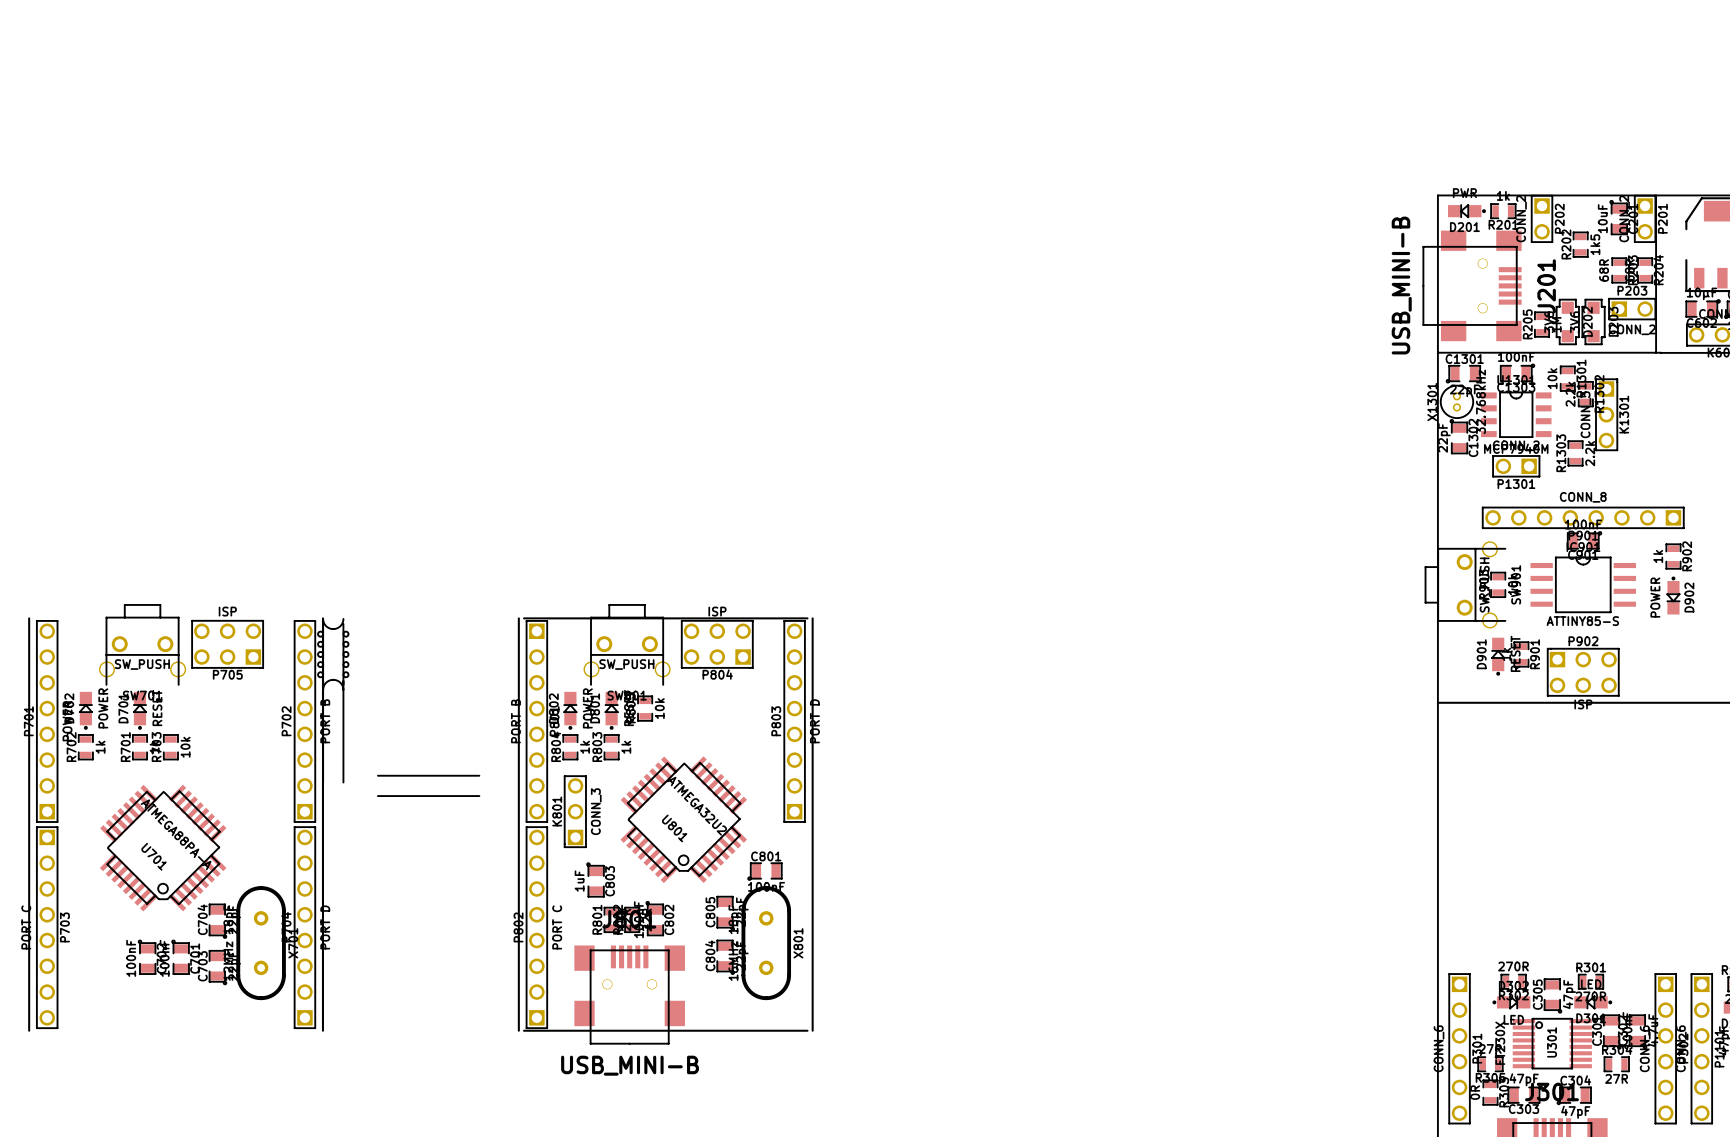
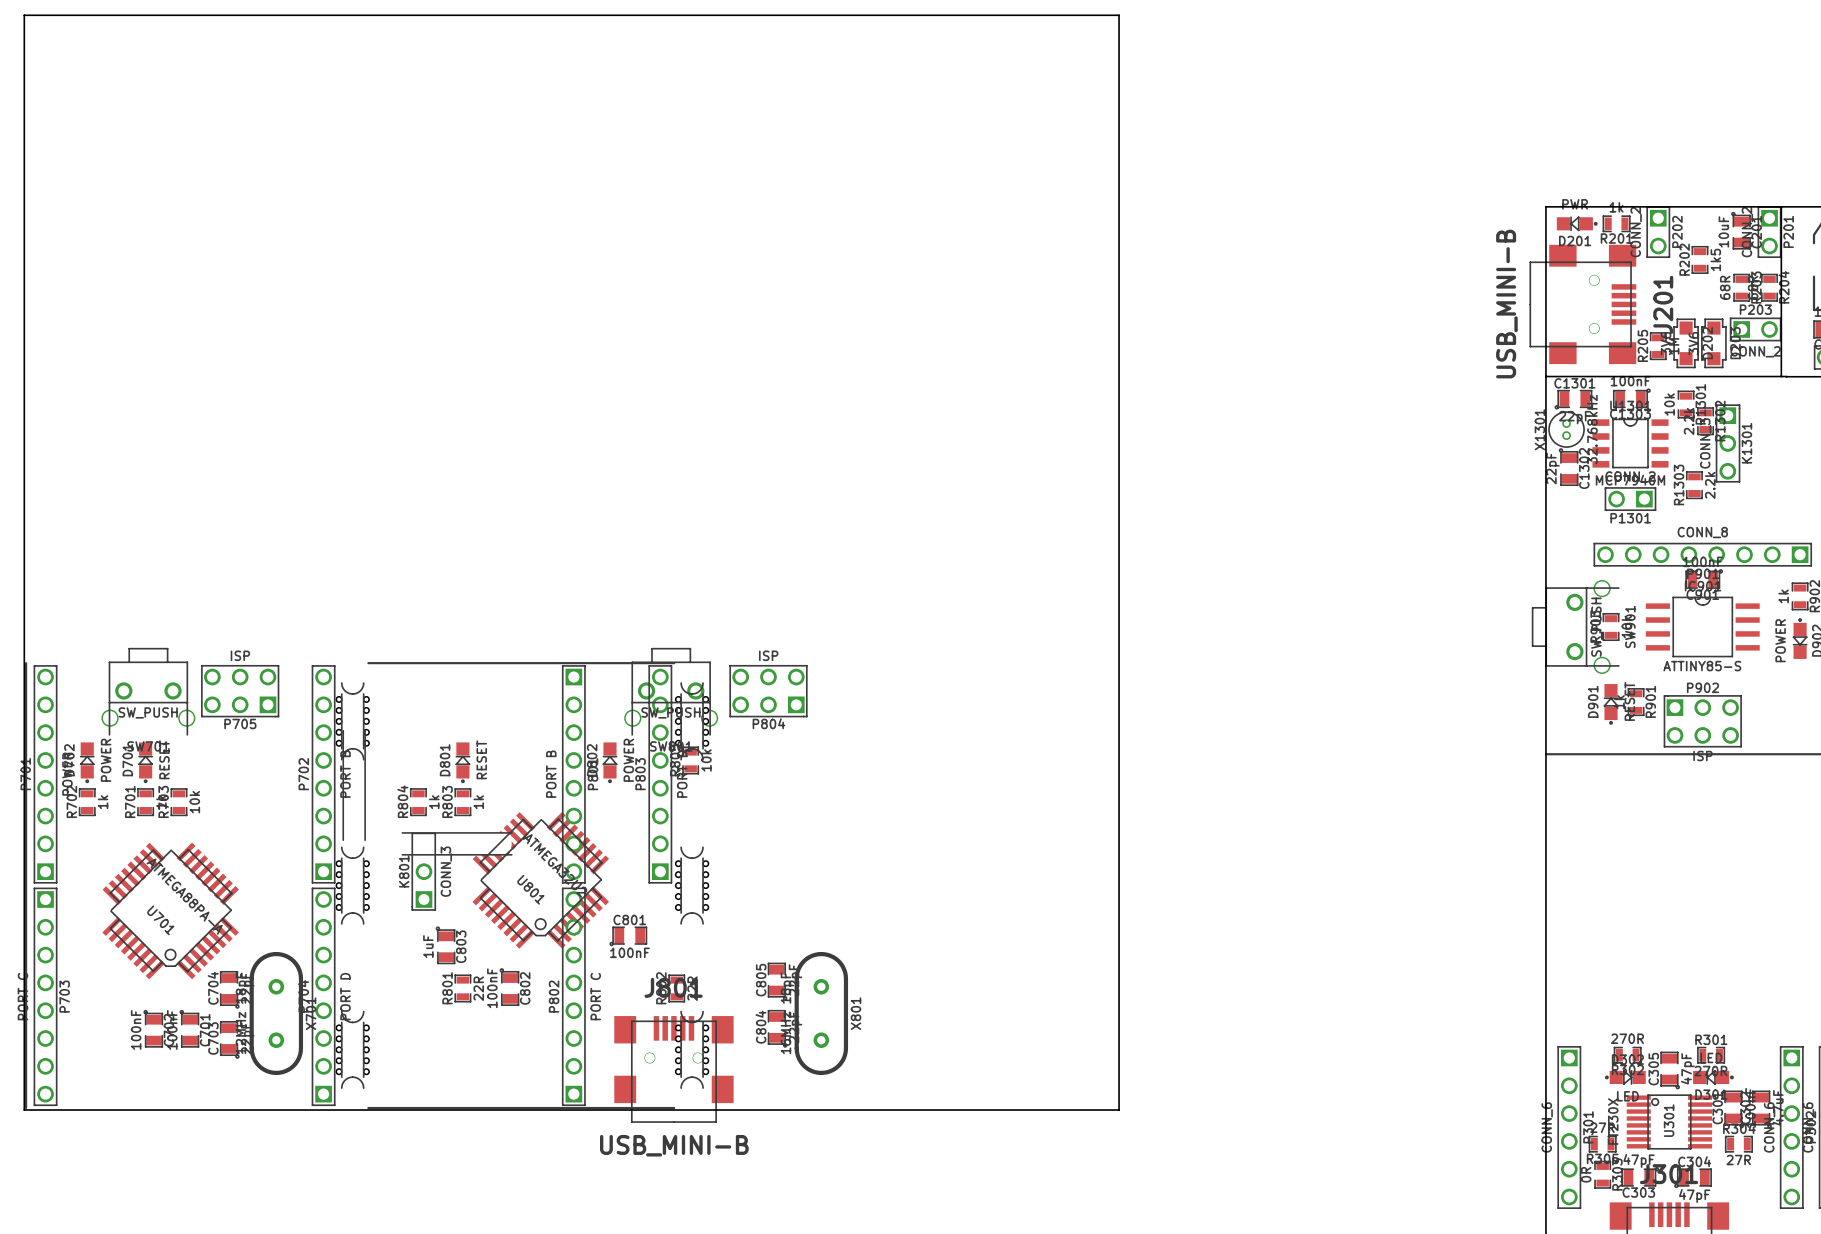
board edge: none -> (24, 15) (24, 1110) (1119, 1110) (1119, 15) (24, 15)
line: (322, 618) (322, 1030) -> none
line: none -> (368, 663) (559, 663)
line: (518, 618) (518, 1030) -> none
line: (629, 618) (807, 618) -> none
line: (812, 618) (812, 1030) -> none
part: (333, 654) -> none
part: none -> (352, 721)
part: none -> (692, 721)
D801 position: (611, 710) -> (462, 762)
P803 position: (794, 721) -> (660, 774)
R804 position: (570, 747) -> (418, 802)
R803 position: (611, 747) -> (462, 802)
K801 position: (575, 811) -> (423, 871)
U801 position: (683, 819) -> (540, 880)
part: none -> (352, 885)
part: none -> (692, 885)
C801 position: (764, 871) -> (628, 936)
C803 position: (595, 879) -> (445, 945)
C802 position: (654, 918) -> (509, 987)
R801 position: (611, 919) -> (462, 988)
part: none -> (352, 1049)
part: none -> (692, 1049)
line: none -> (368, 1108) (559, 1108)
line: (629, 1030) (807, 1030) -> none

